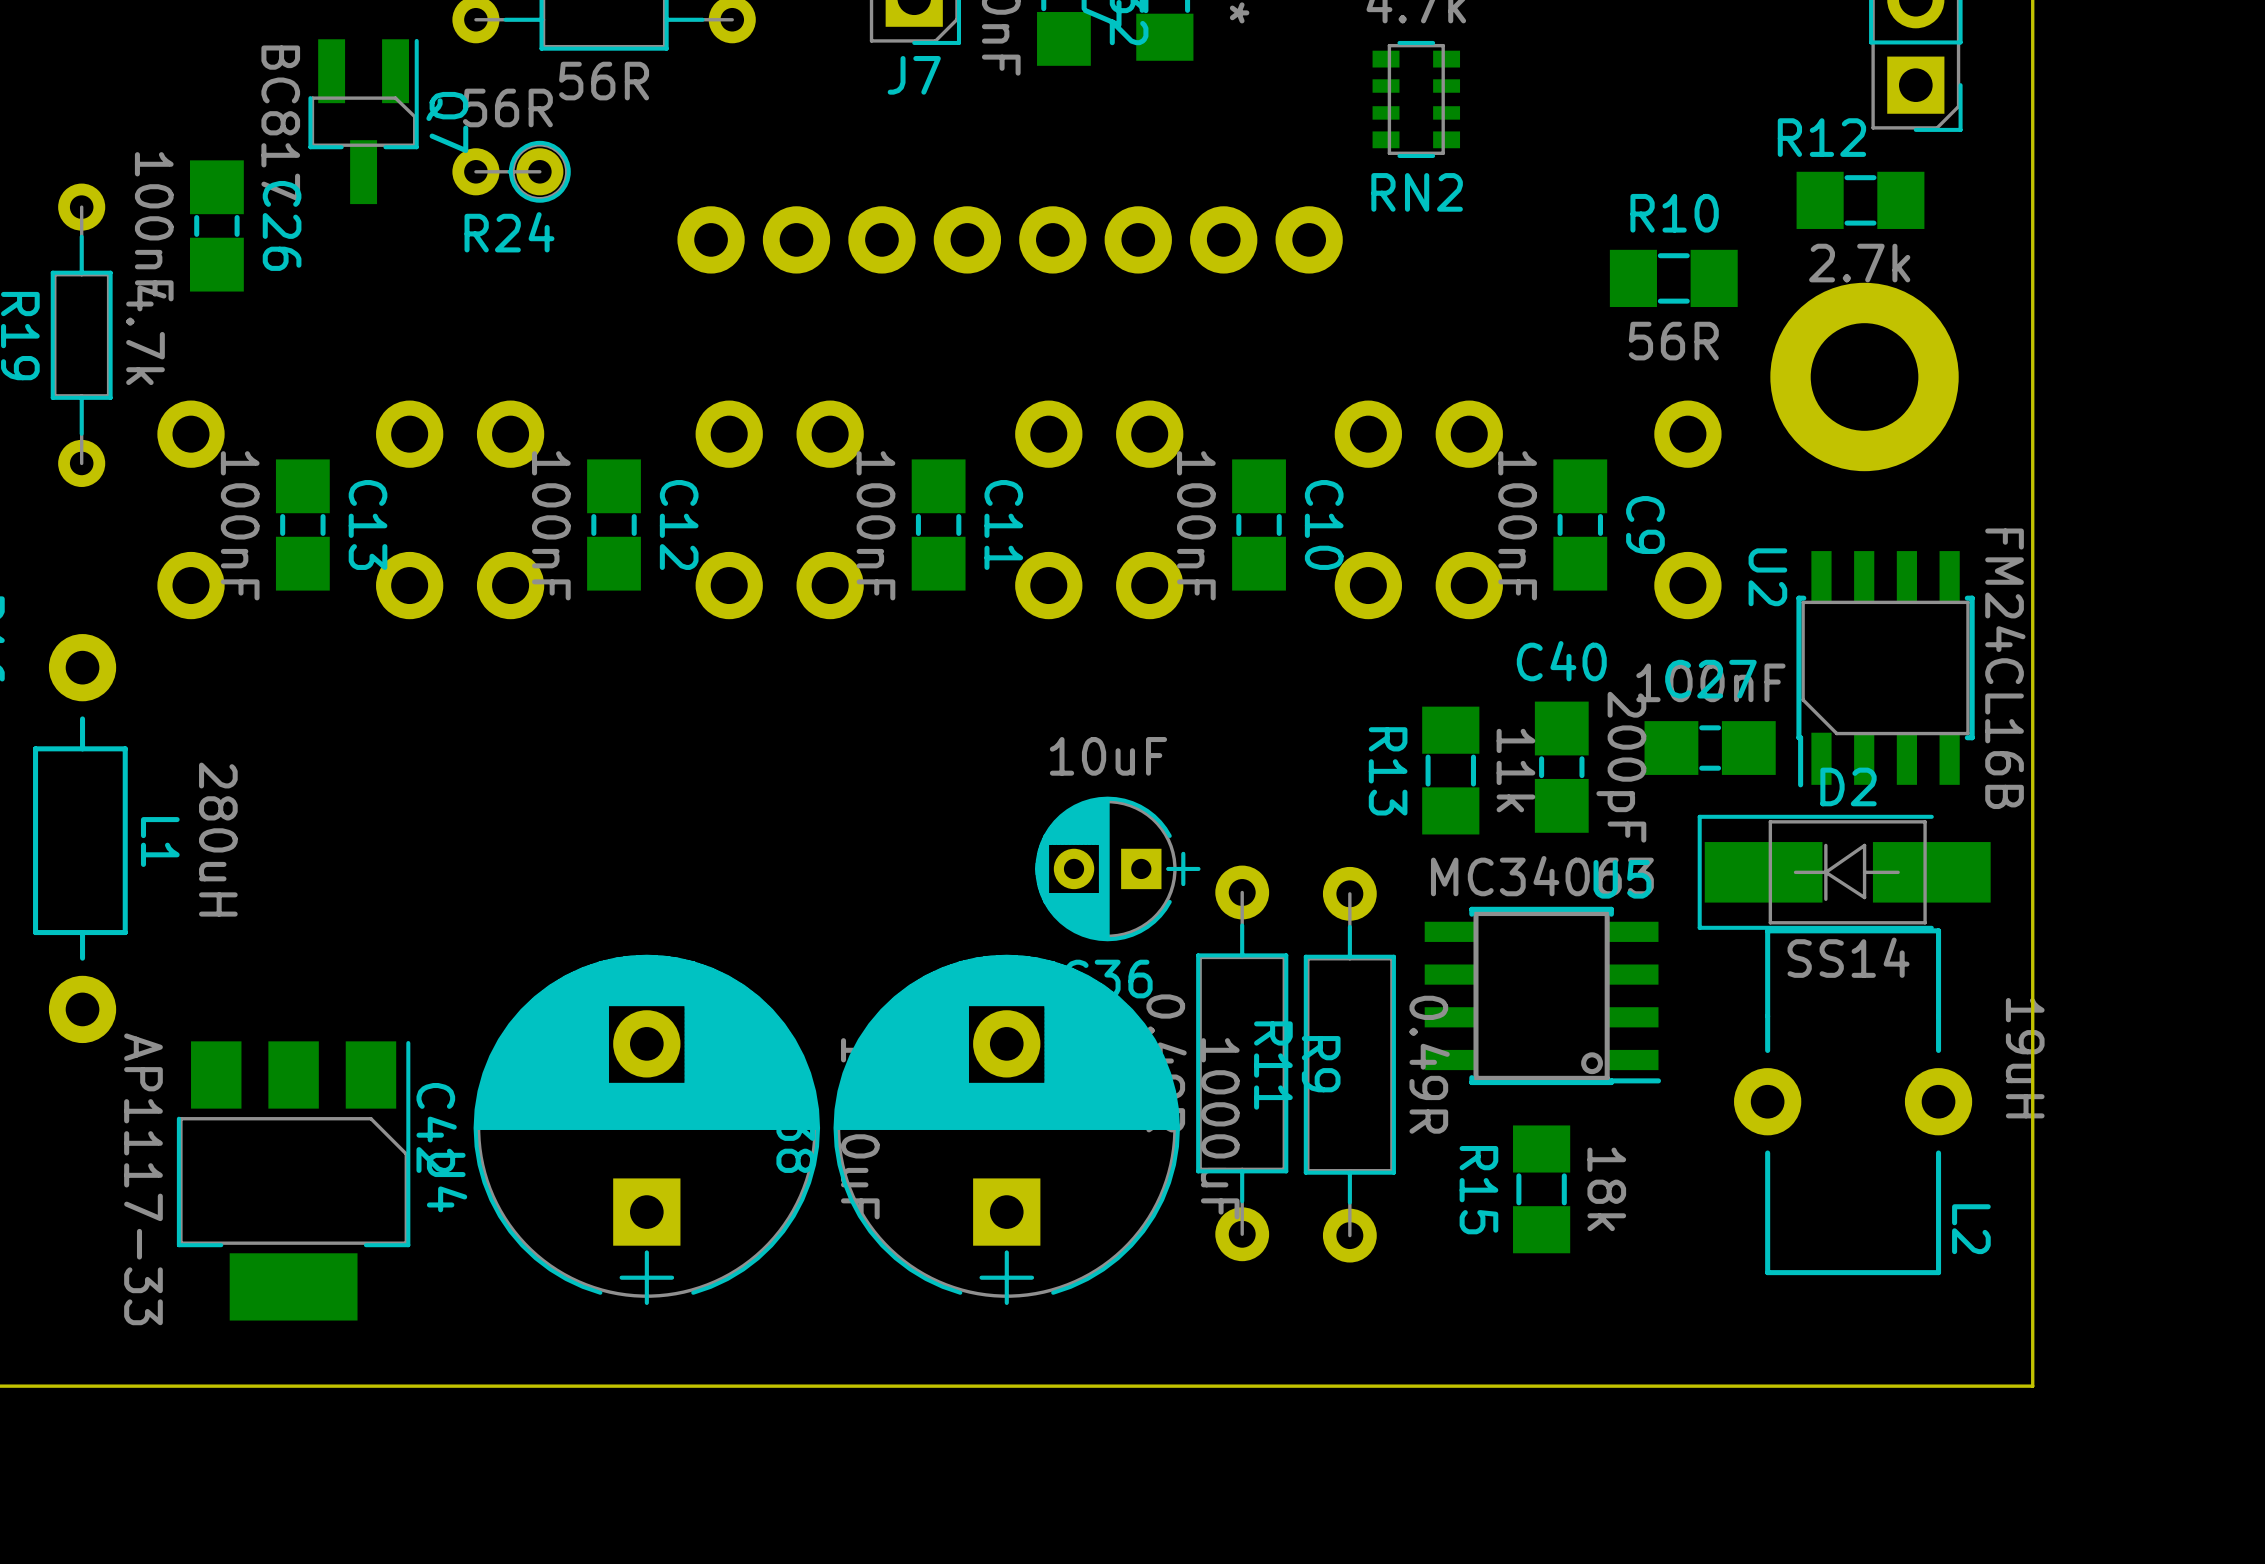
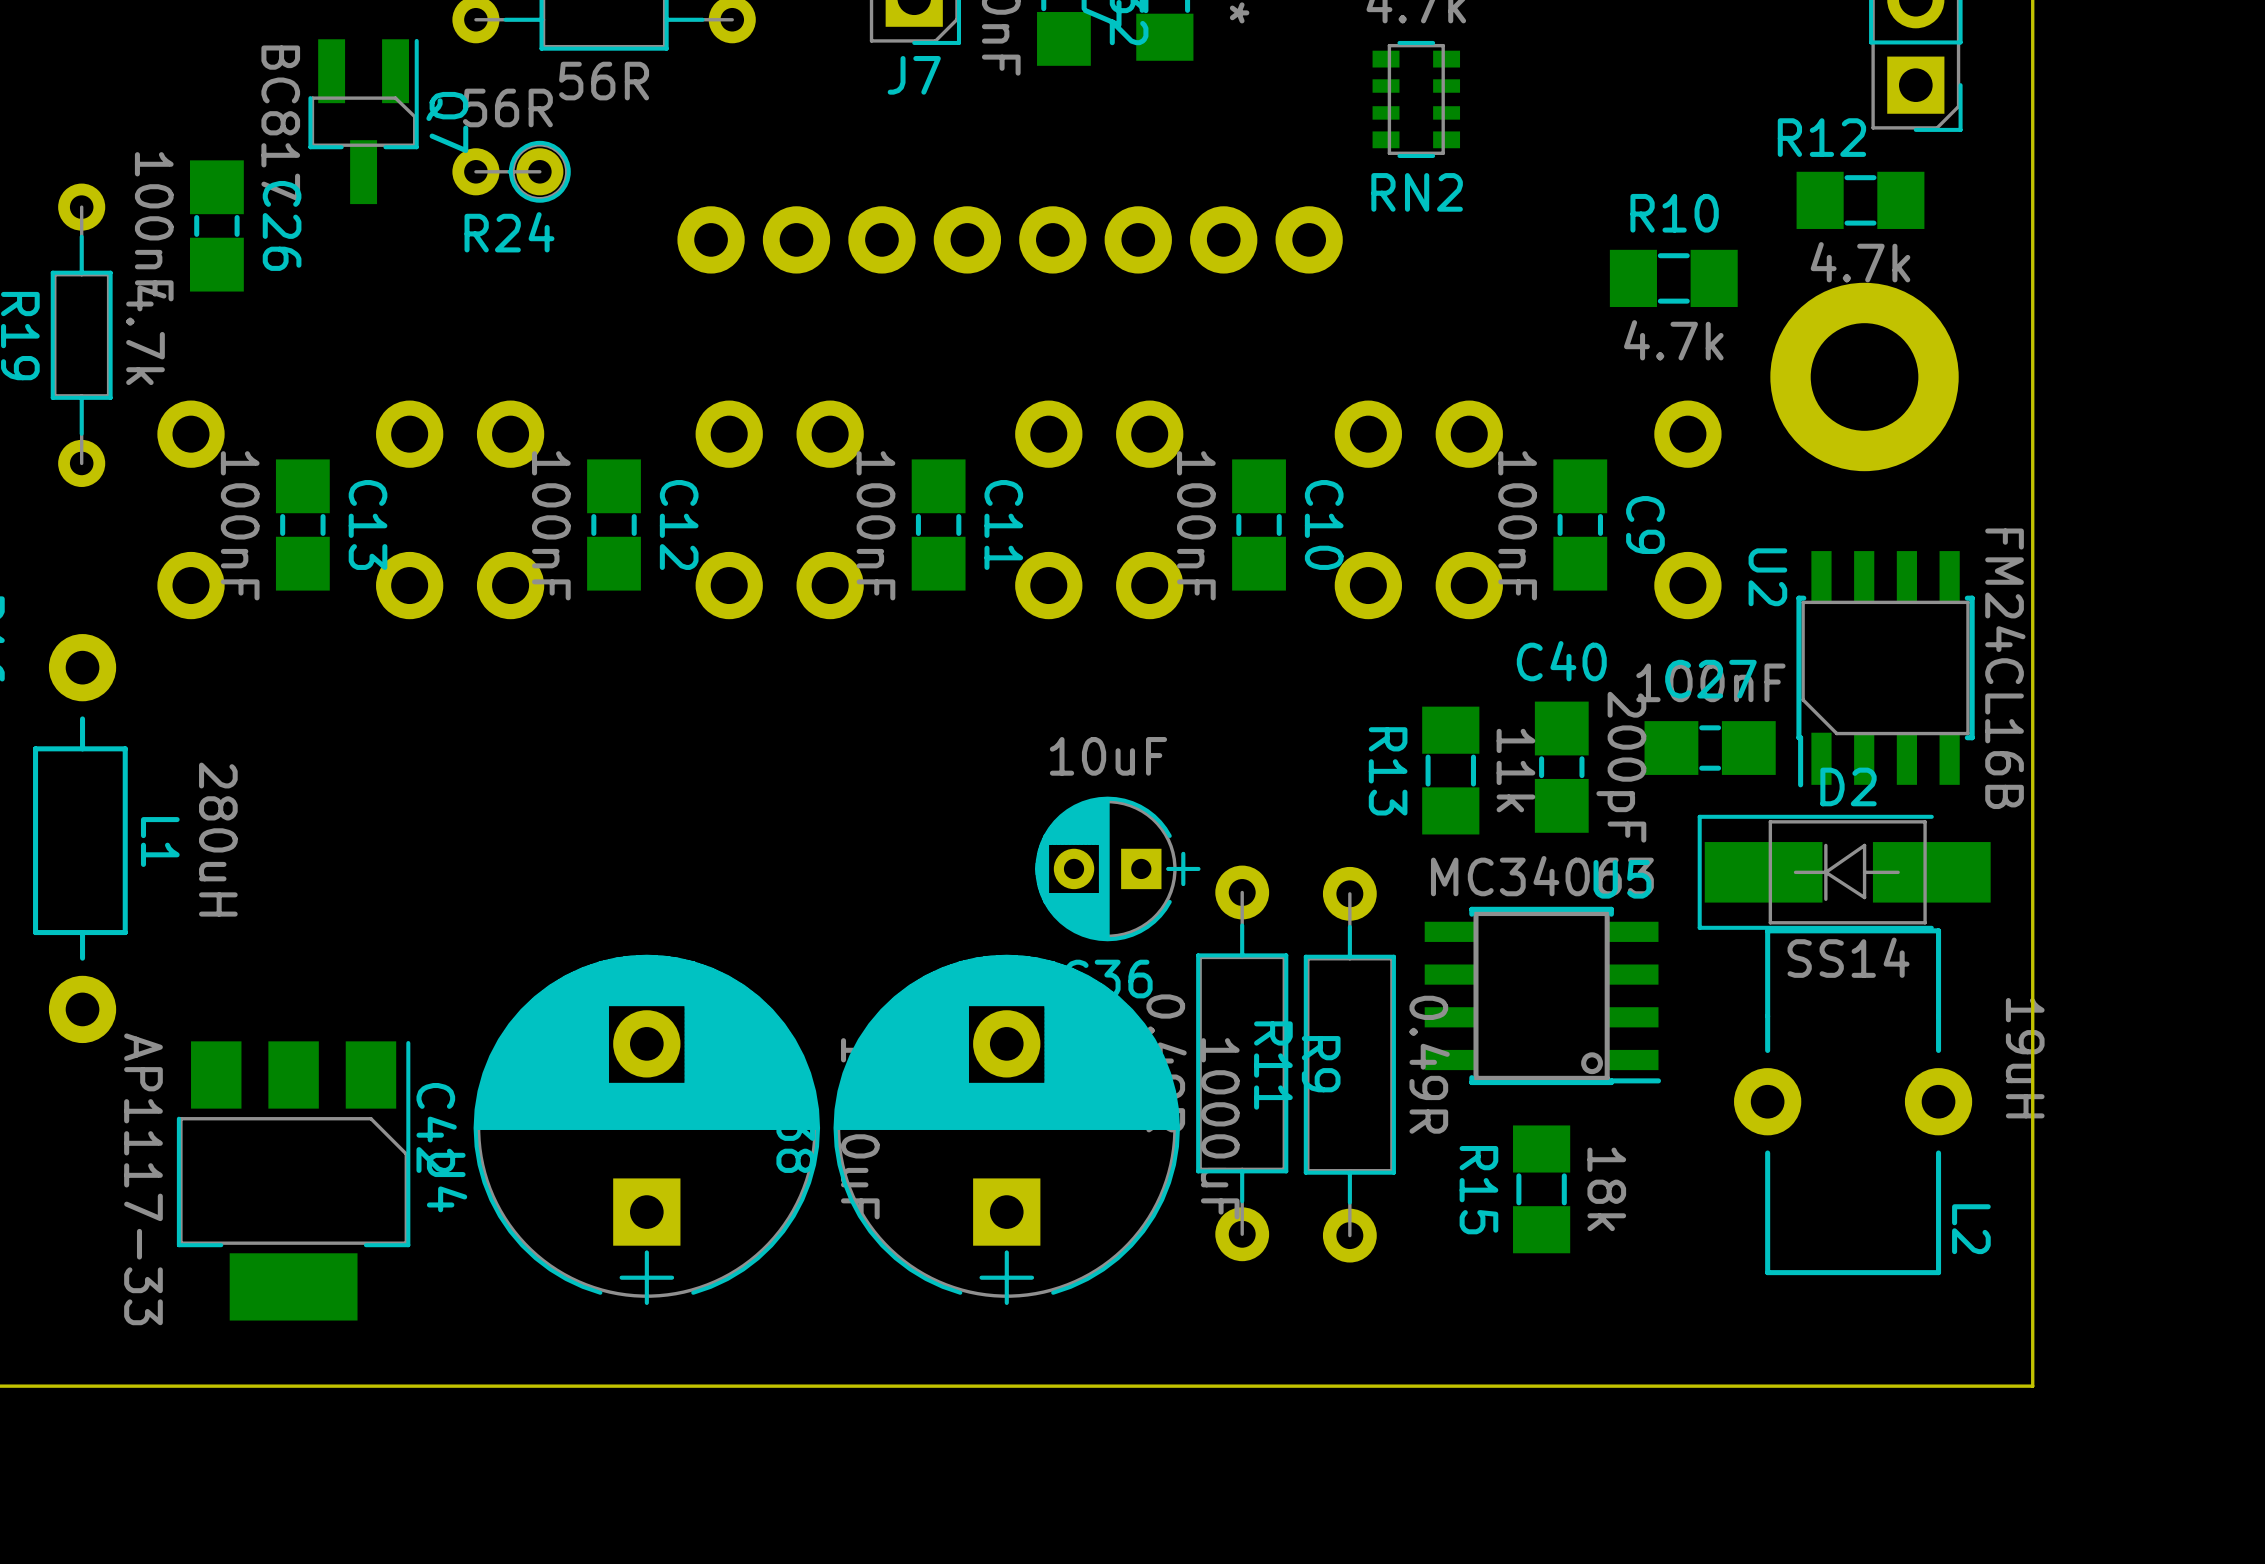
R12 value: 2.7k (1859, 263) -> 4.7k (1860, 262)
R10 value: 56R (1673, 341) -> 4.7k (1673, 340)

